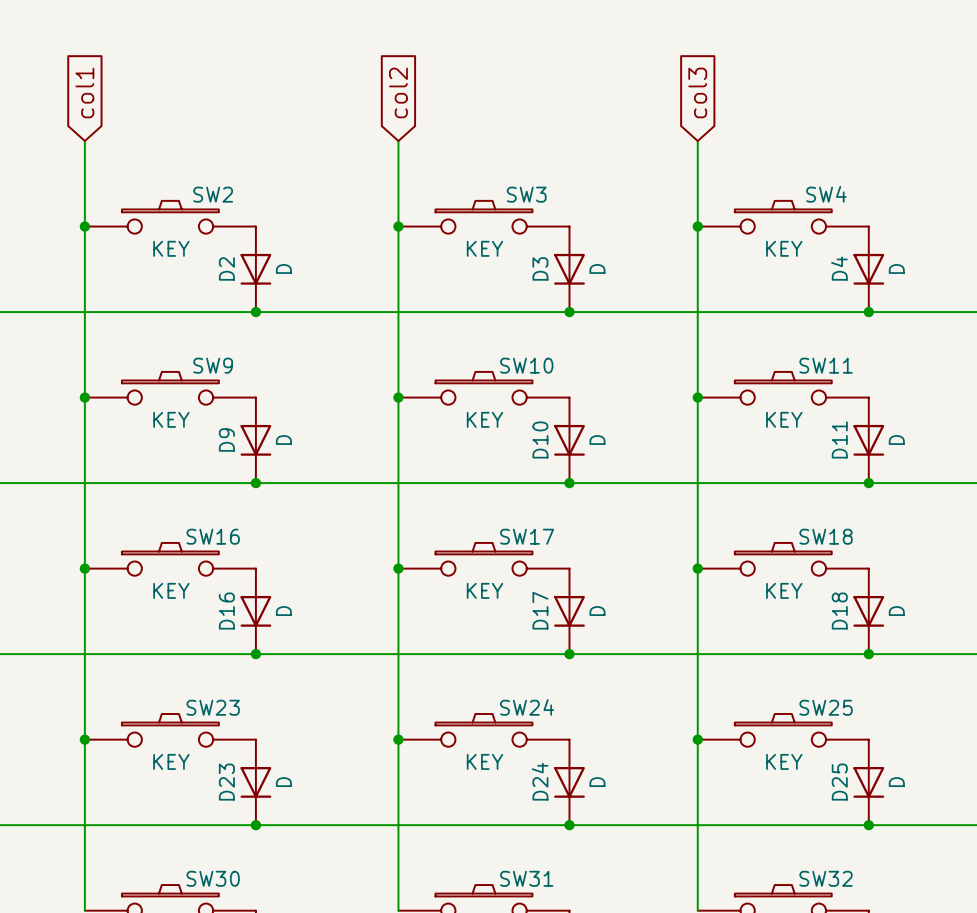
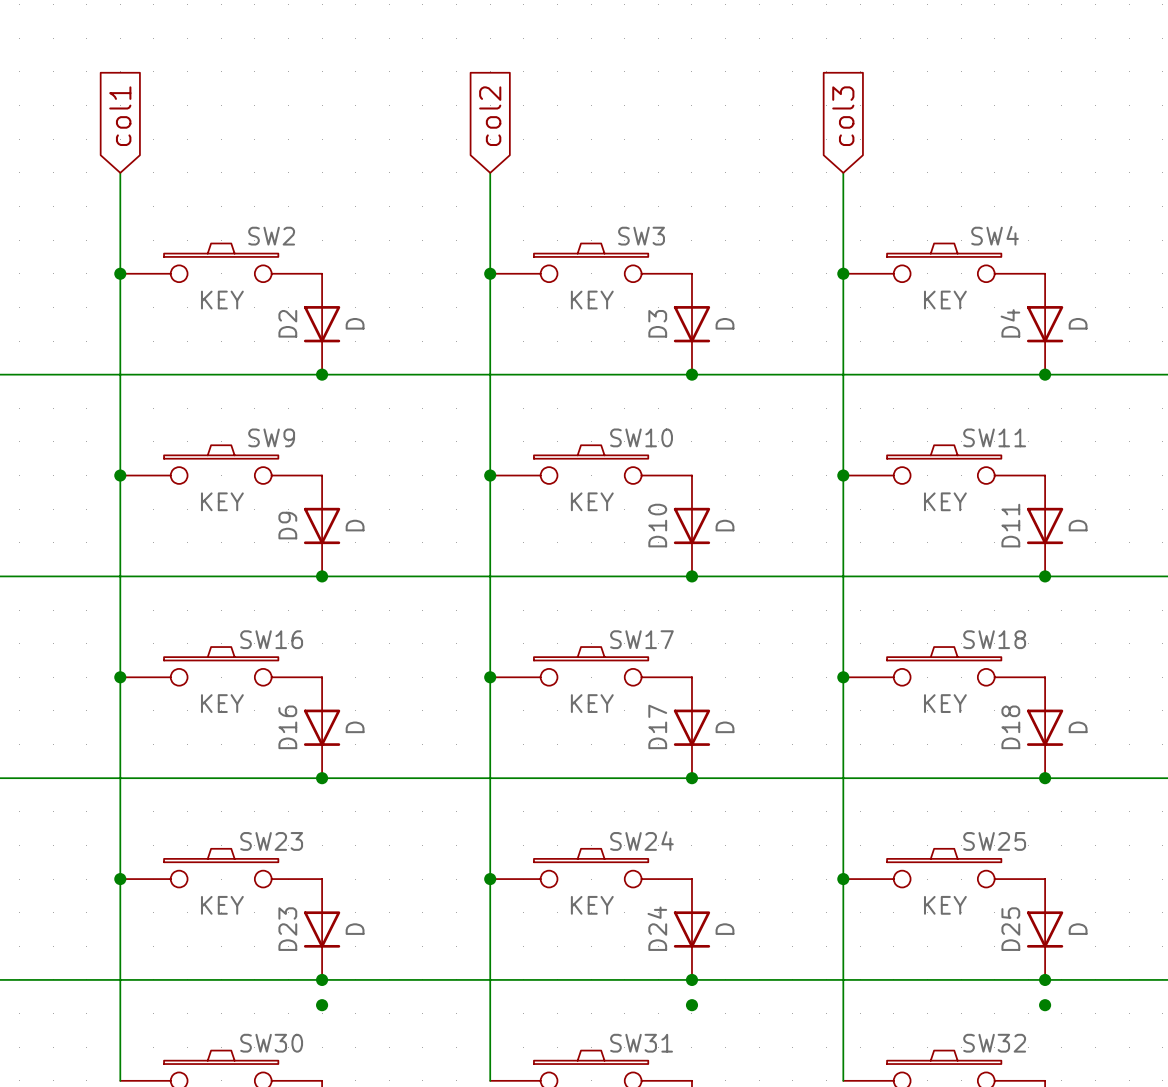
junction: none -> (322, 1005)
junction: none -> (691, 1005)
junction: none -> (1045, 1005)

